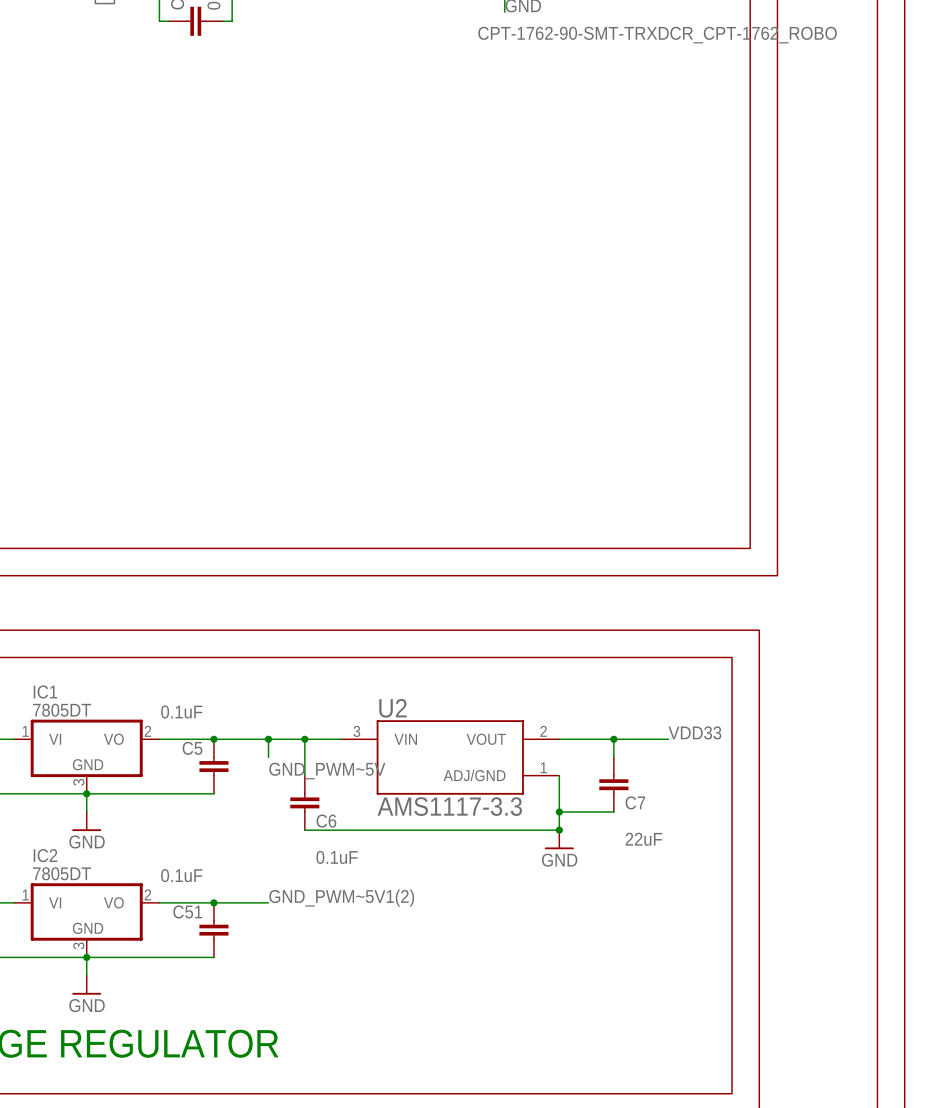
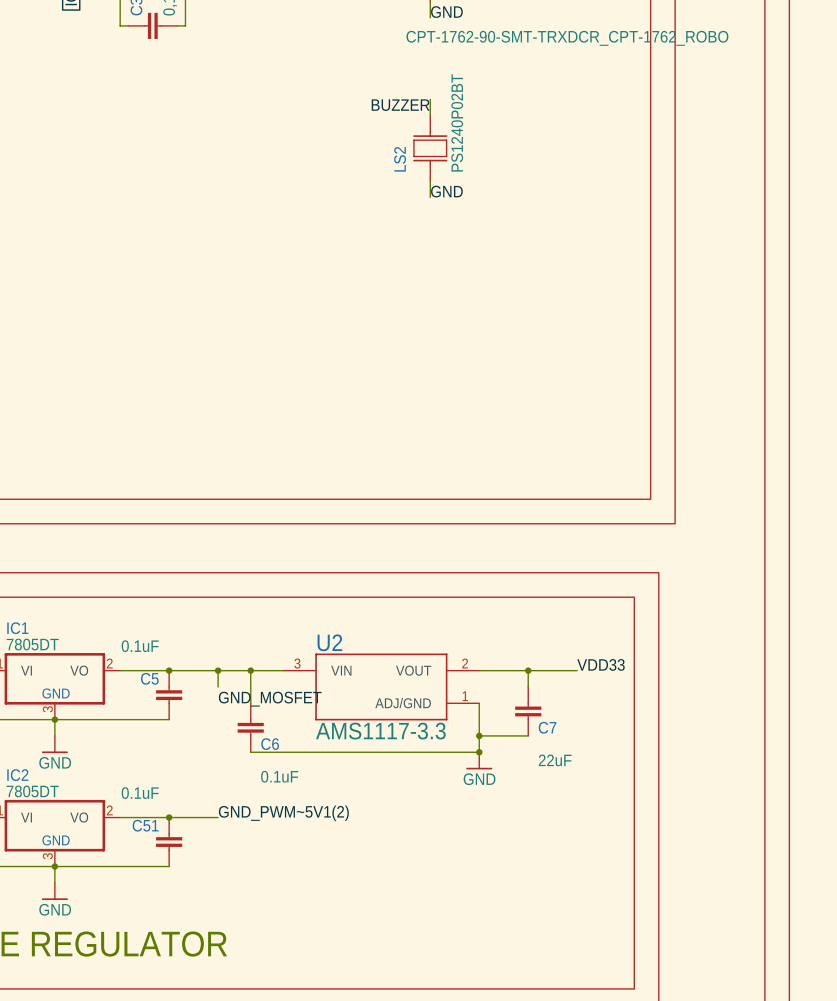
wire: none -> (430, 99) (430, 115)
label: none -> BUZZER (400, 105)
LS2: none -> PS1240P02BT (430, 148)
wire: none -> (430, 180) (430, 197)
label: none -> GND (446, 191)
label: GND_PWM~5V (327, 771) -> GND_MOSFET (270, 699)

